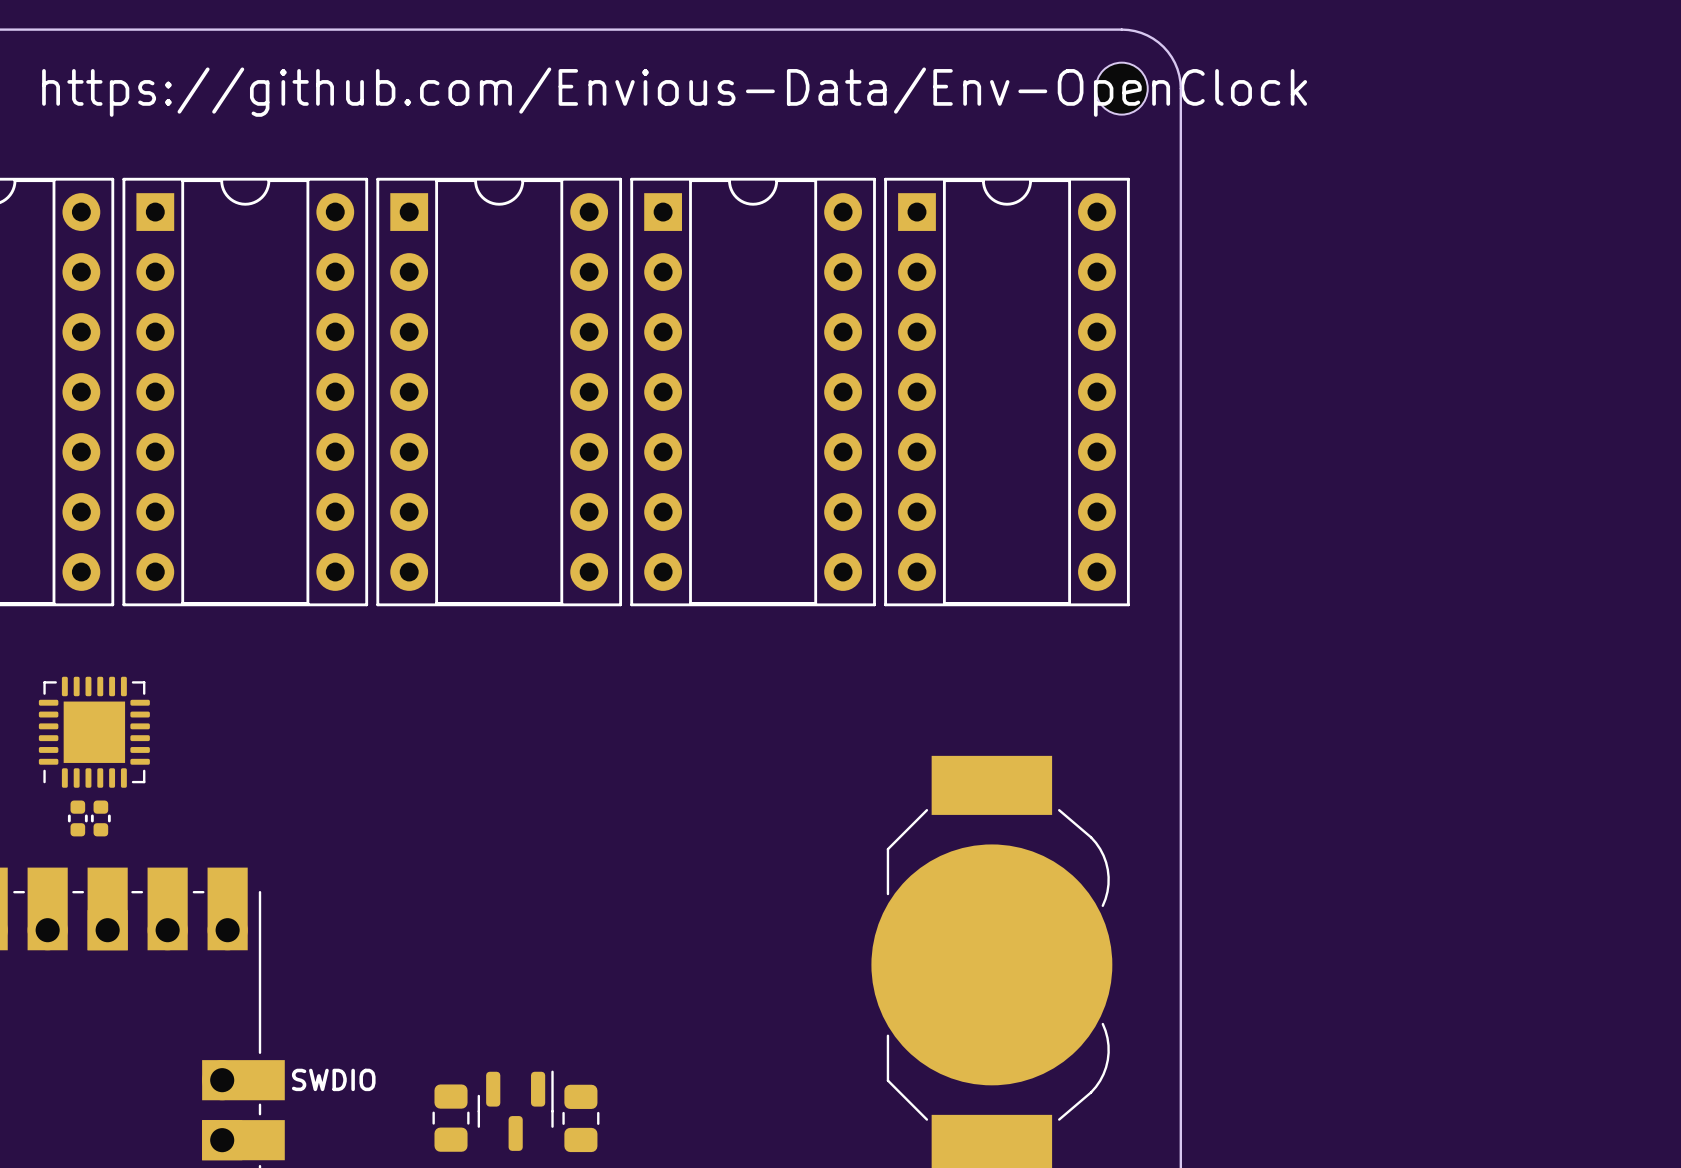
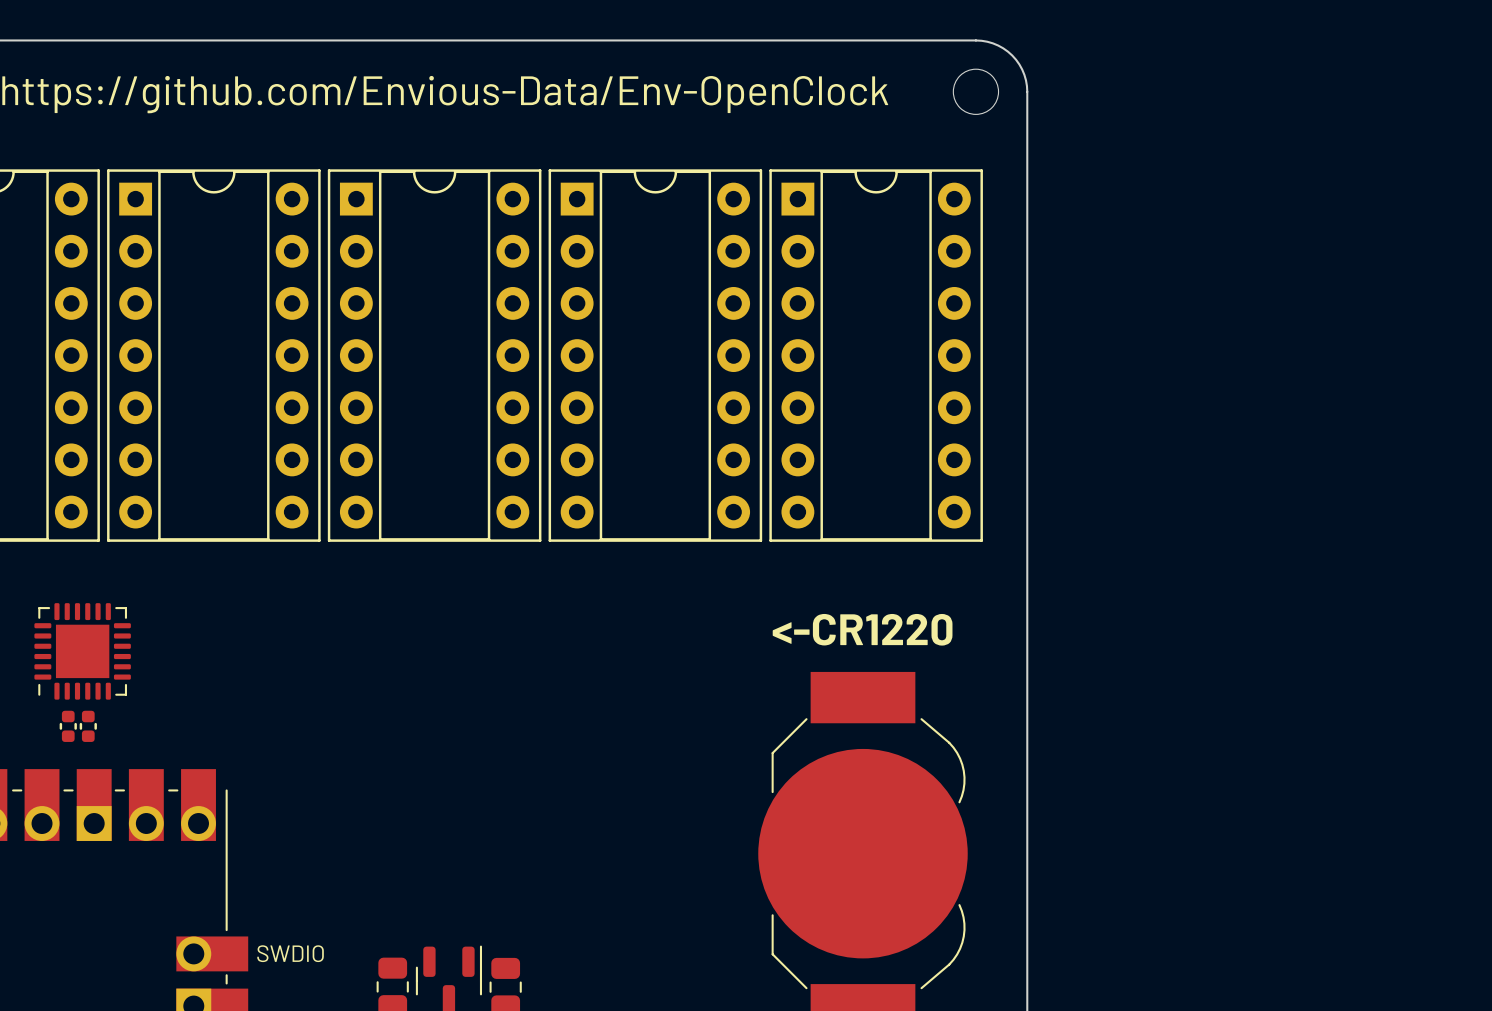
text: none -> <-CR1220 (862, 629)

